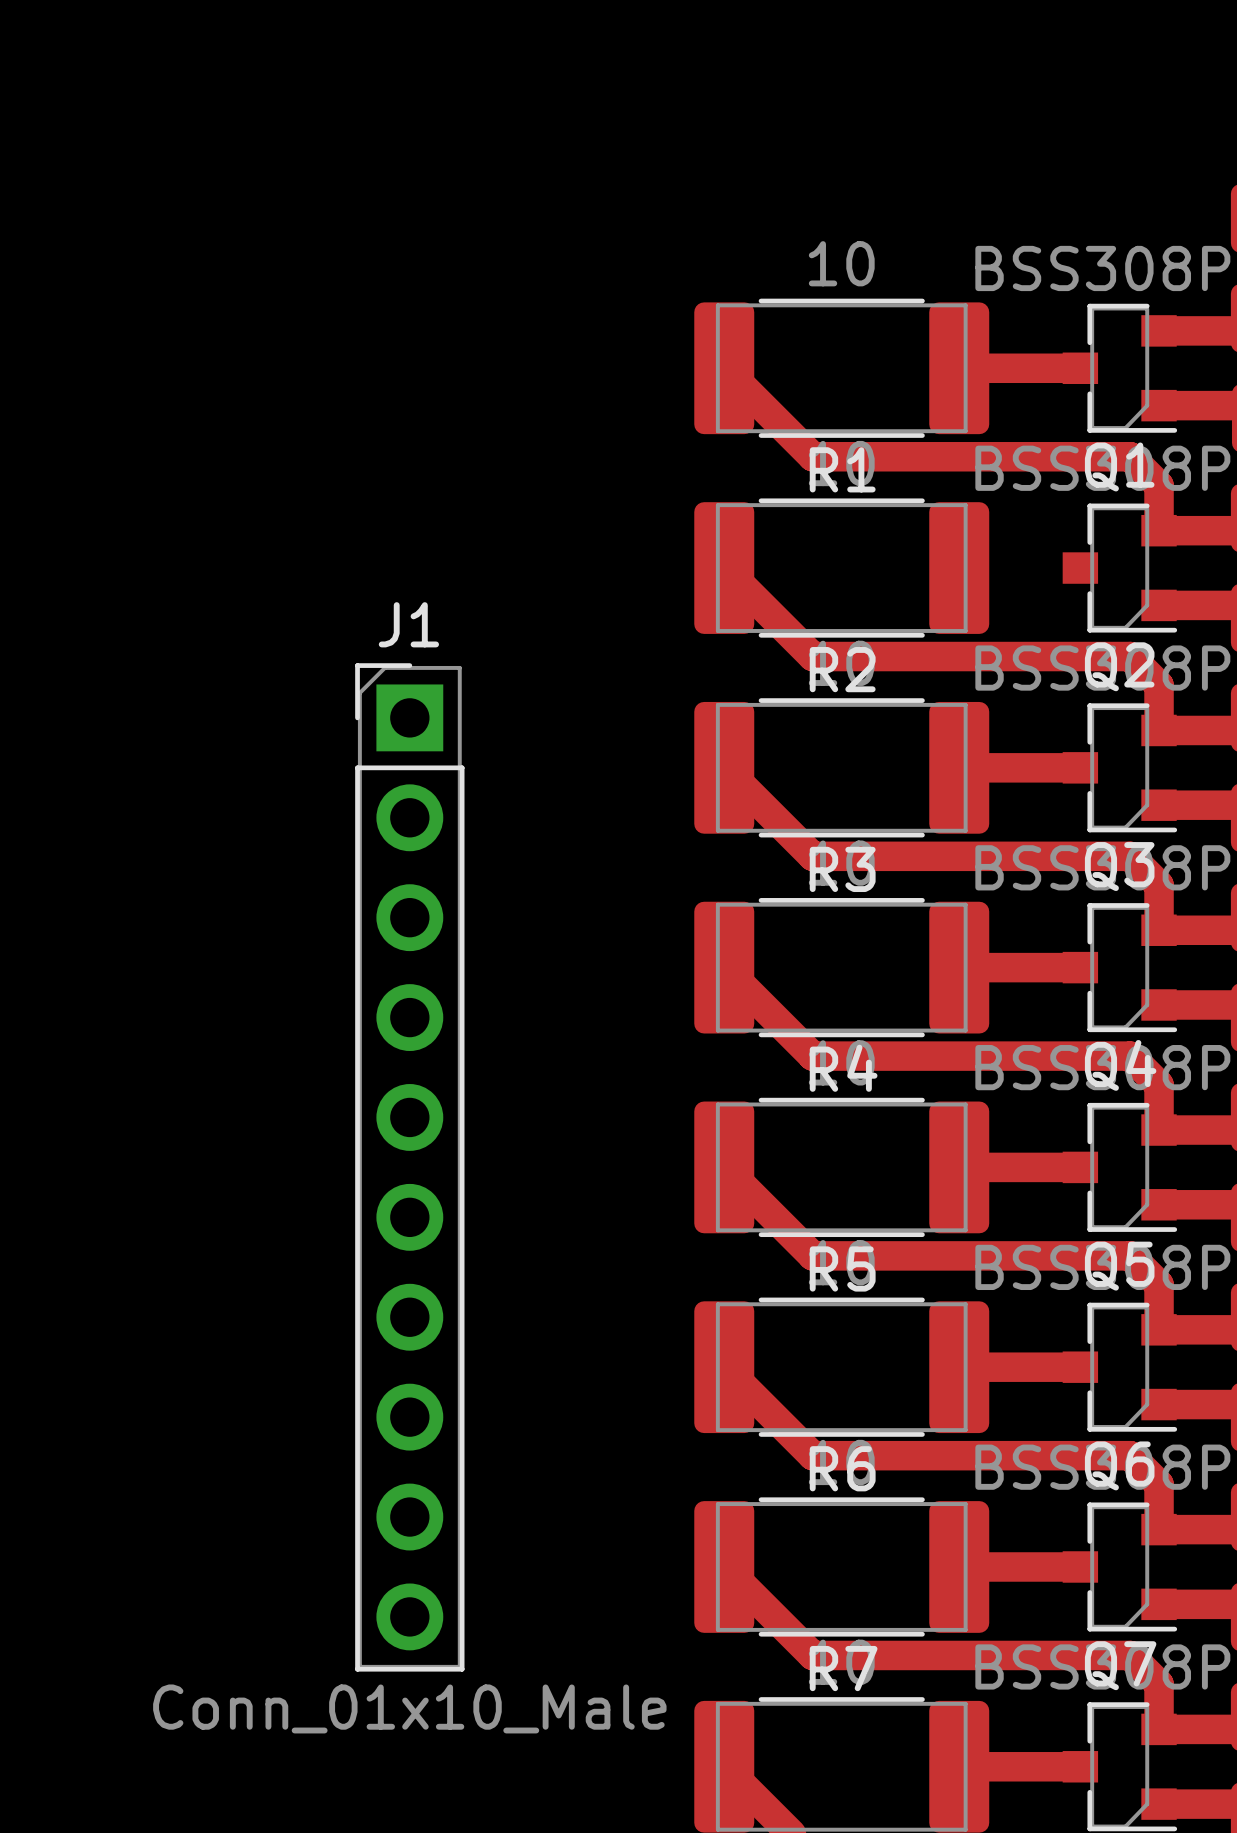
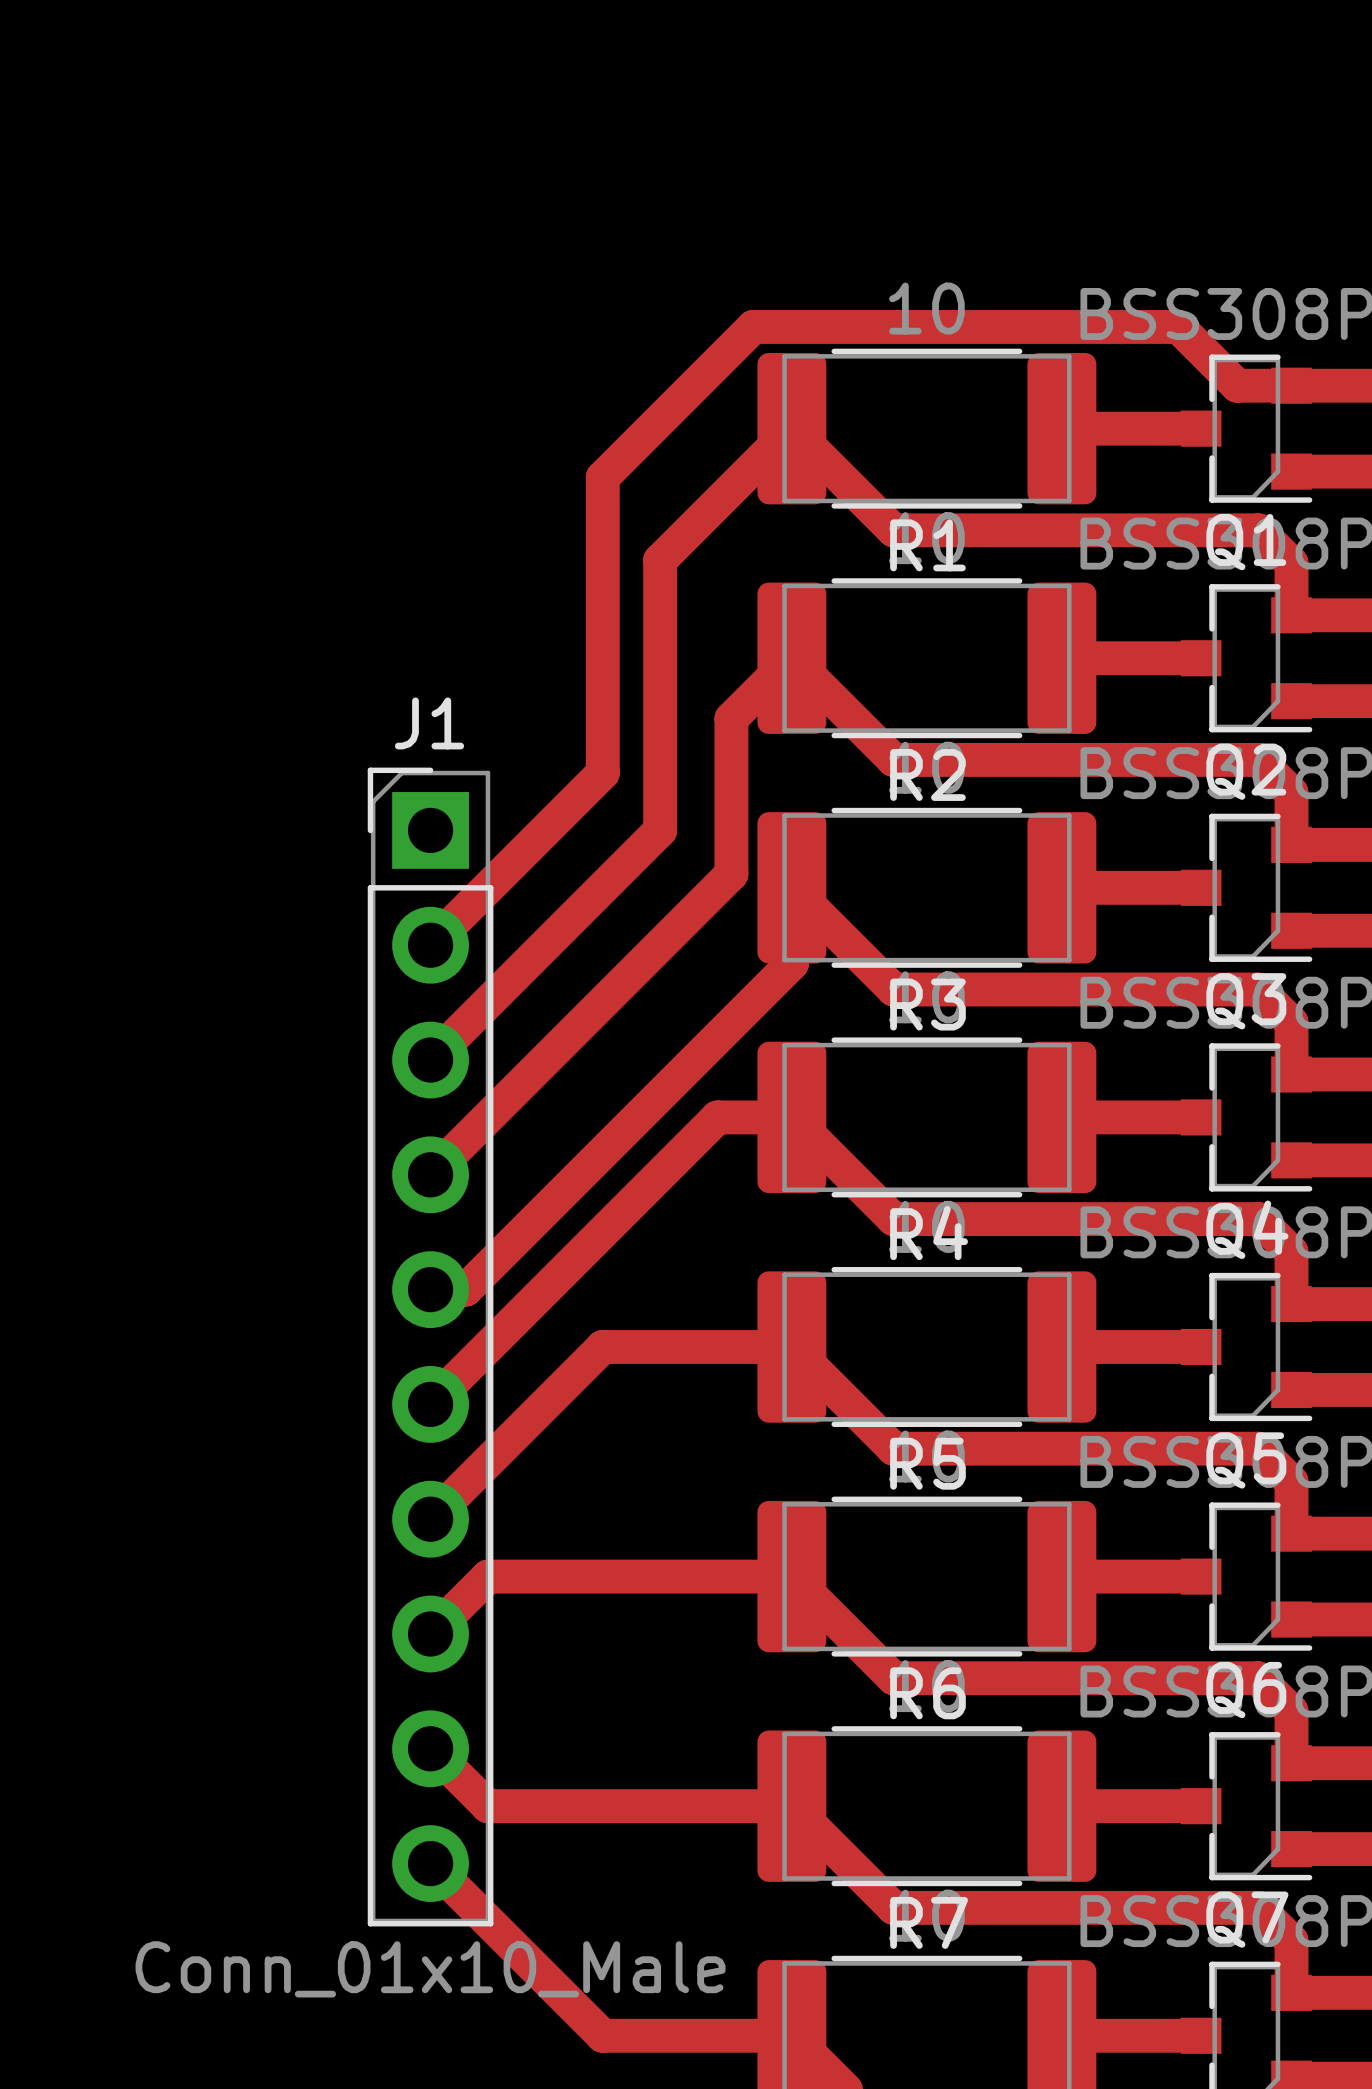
track: none -> (1291, 385) (1237, 385) (1178, 326) (753, 326) (602, 477) (602, 773) (430, 945)
track: none -> (791, 428) (660, 560) (660, 830) (430, 1060)
track: none -> (791, 658) (731, 718) (731, 873) (430, 1174)
track: none -> (1061, 658) (1201, 658)
track: none -> (791, 887) (791, 963) (465, 1289) (430, 1289)
track: none -> (791, 1117) (717, 1117) (430, 1404)
track: none -> (791, 1347) (602, 1347) (430, 1519)
track: none -> (791, 1576) (487, 1576) (430, 1633)
track: none -> (430, 1748) (487, 1806) (791, 1806)
track: none -> (430, 1863) (602, 2035) (791, 2035)

